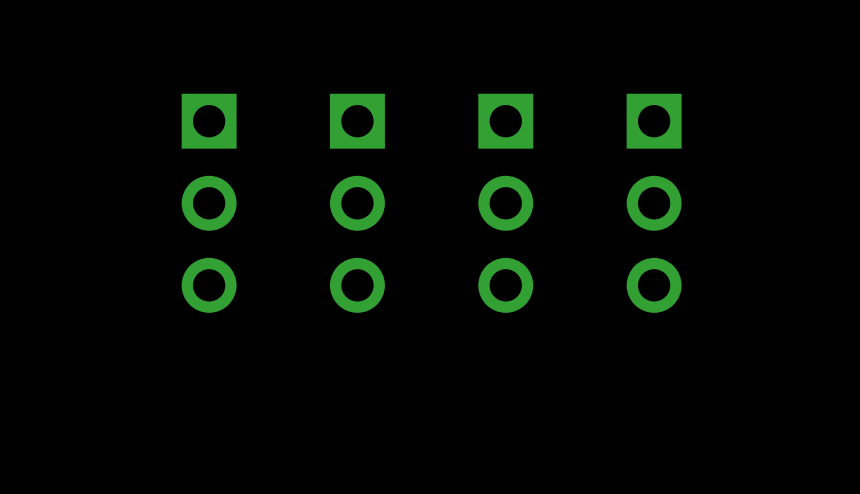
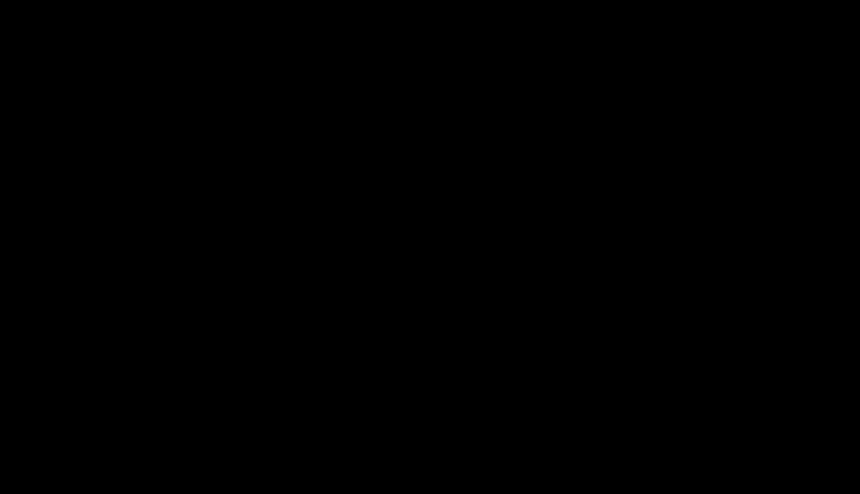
part: (209, 203) -> none
part: (357, 203) -> none
part: (505, 203) -> none
part: (654, 203) -> none

